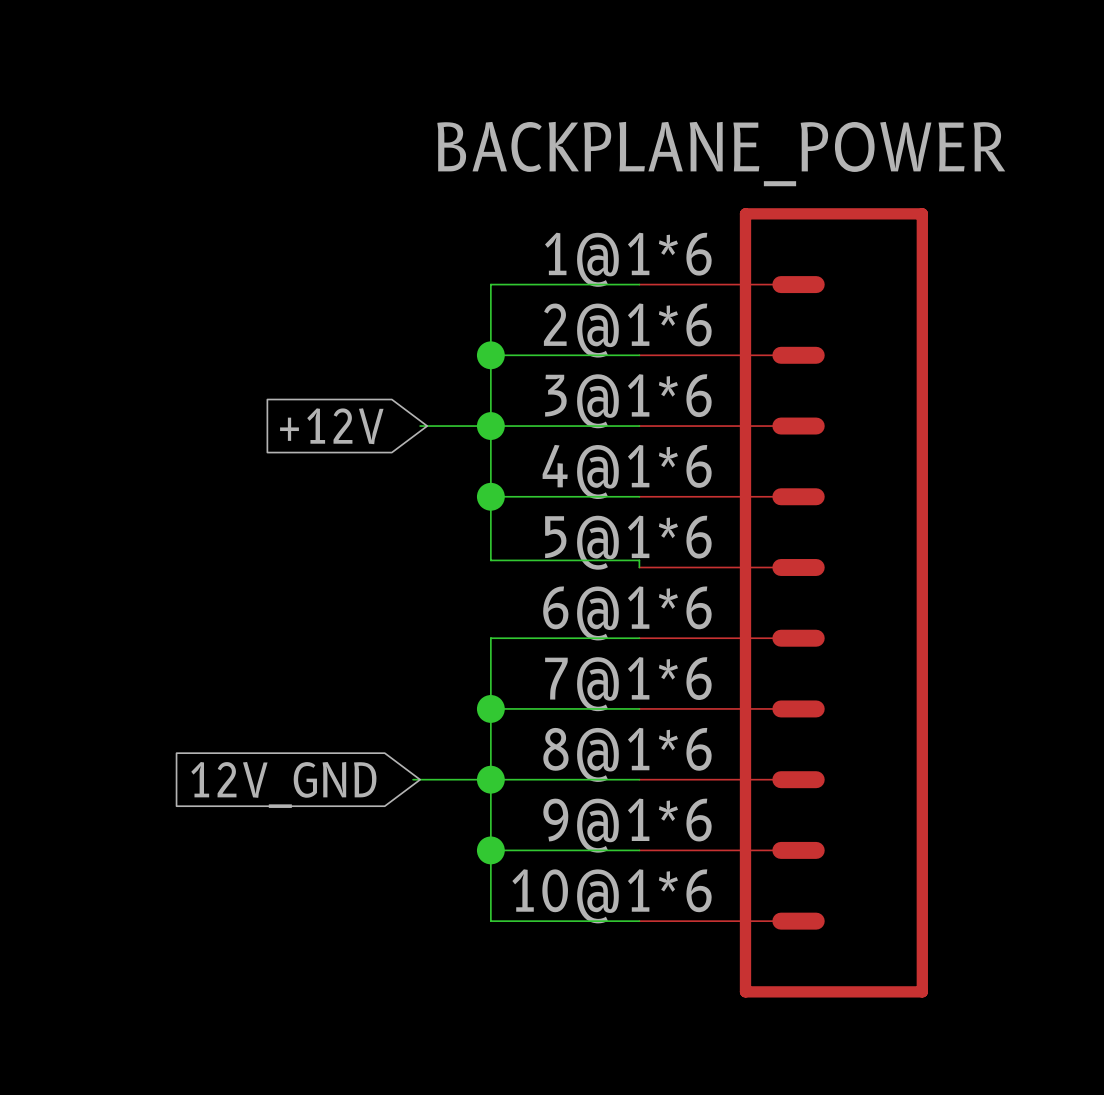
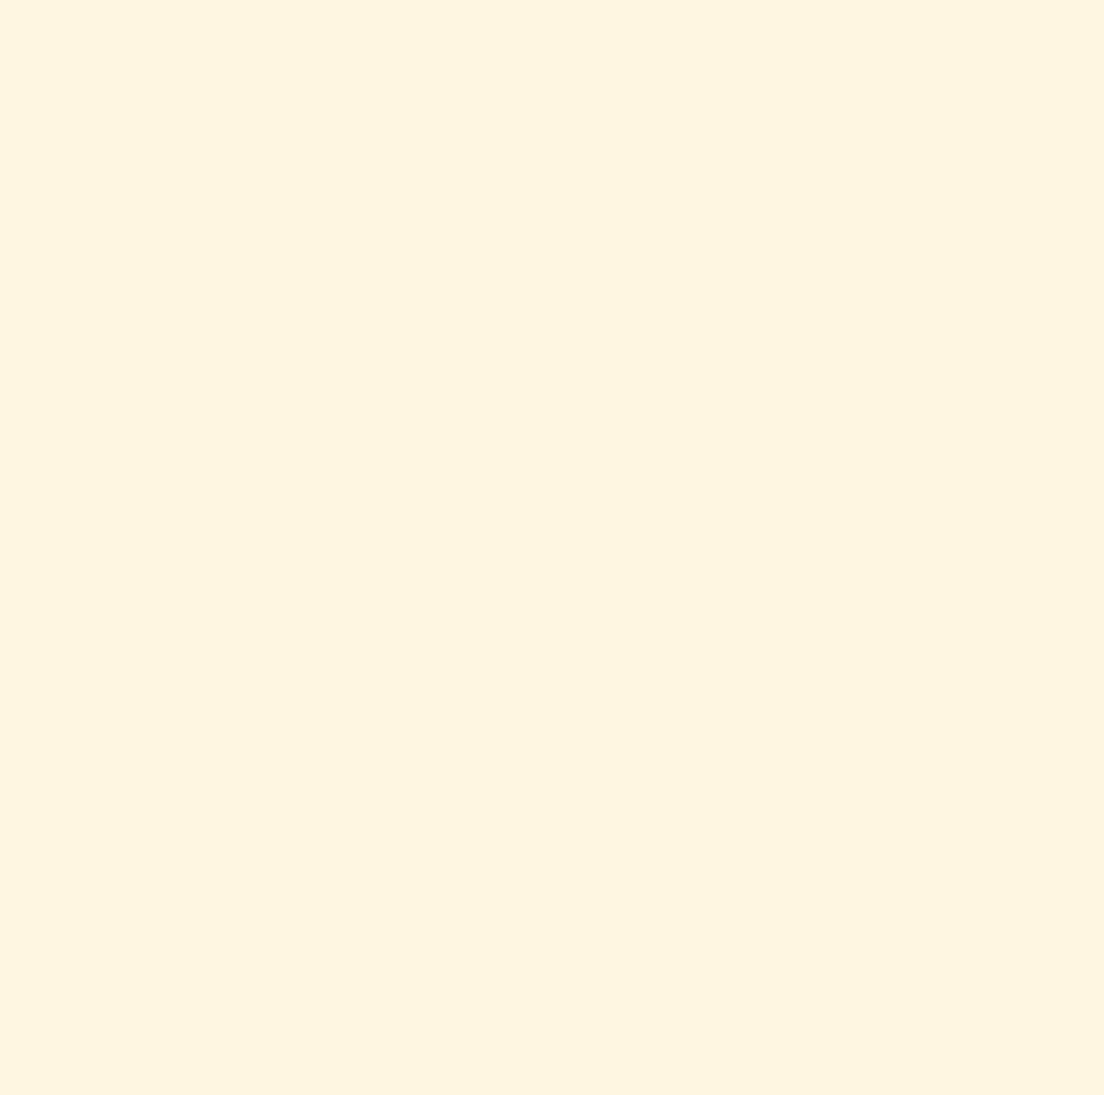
wire: (639, 284) (490, 284) (490, 560) (639, 560) (639, 567) -> none
wire: (490, 355) (639, 355) -> none
junction: (490, 355) -> none
global label: +12V (331, 426) -> none
wire: (420, 426) (639, 426) -> none
junction: (490, 426) -> none
wire: (490, 496) (639, 496) -> none
junction: (490, 496) -> none
BACKPLANE_POWER: (783, 602) -> none
wire: (639, 638) (490, 638) (490, 921) (639, 921) -> none
wire: (490, 708) (639, 708) -> none
junction: (490, 708) -> none
wire: (413, 779) (639, 779) -> none
junction: (490, 779) -> none
global label: 12V_GND (283, 784) -> none
wire: (490, 850) (639, 850) -> none
junction: (490, 850) -> none

